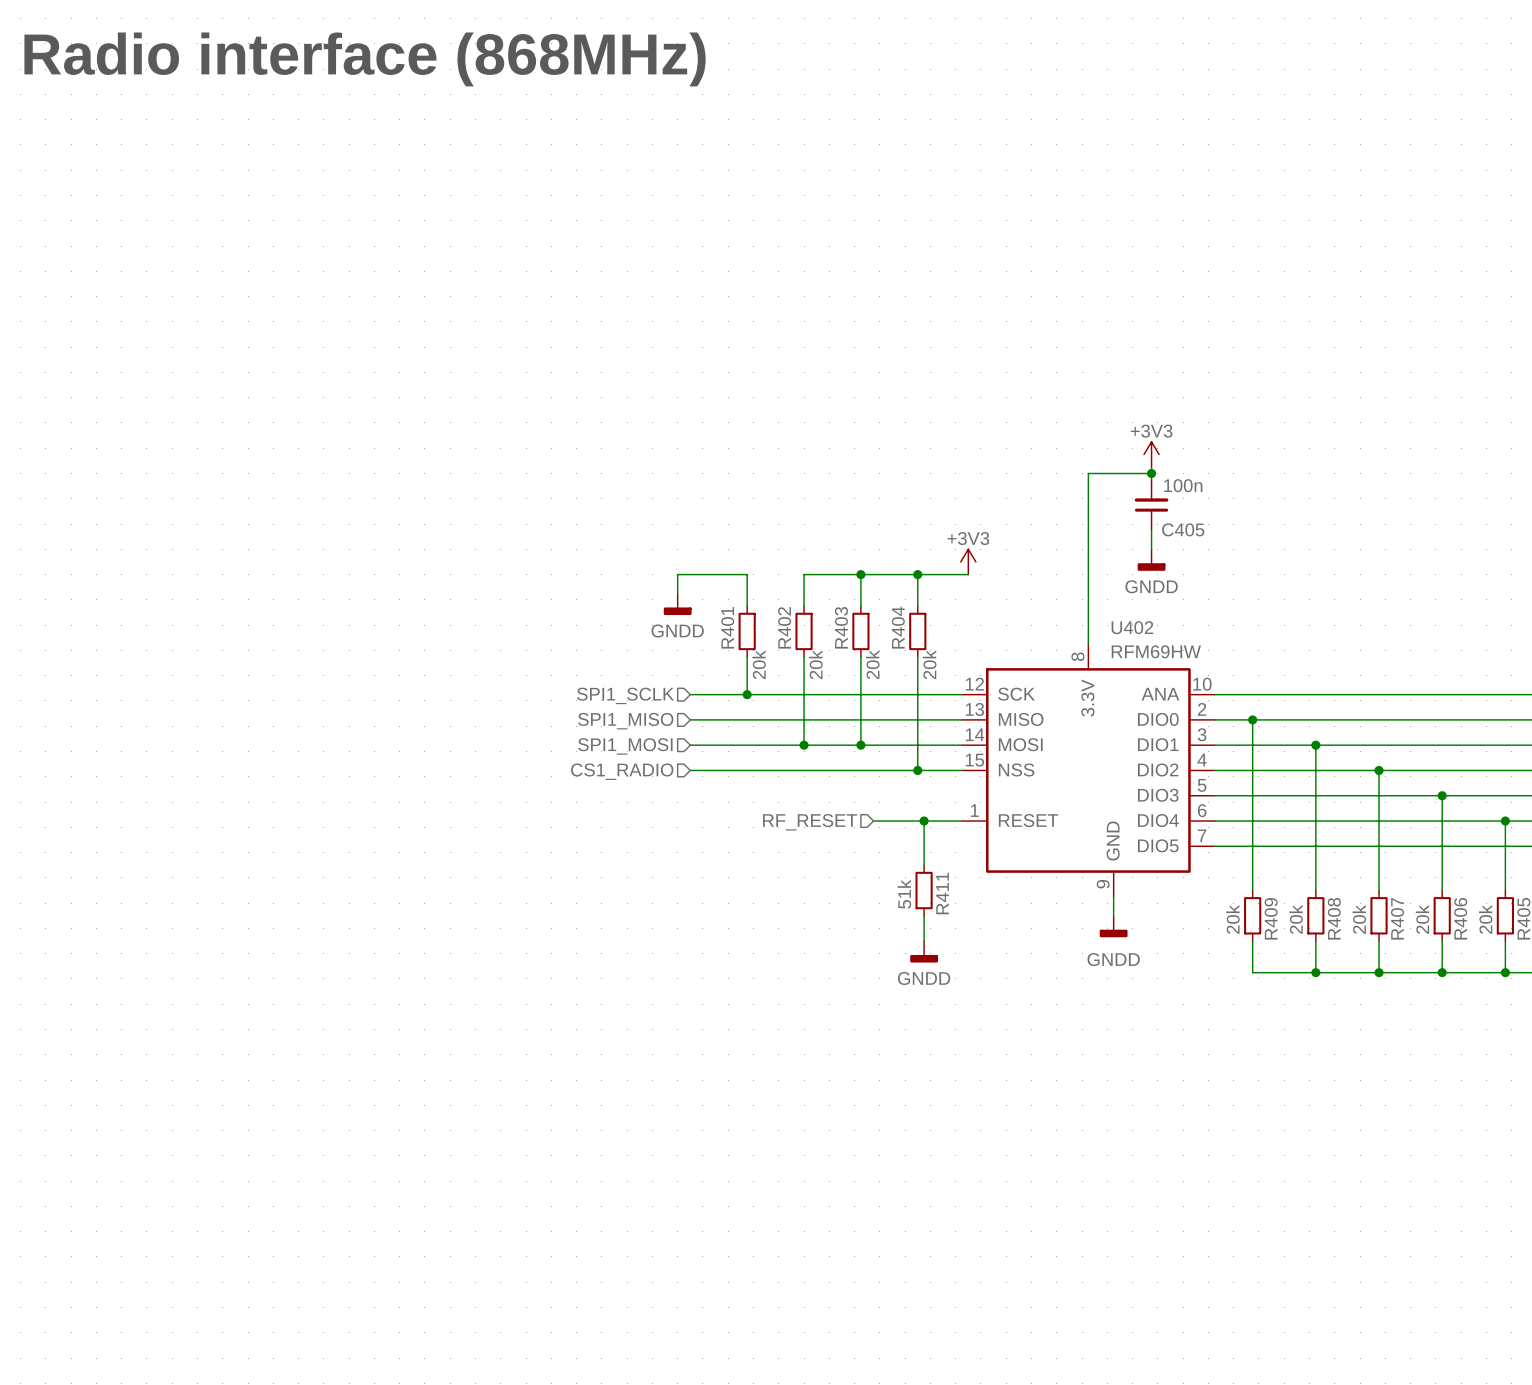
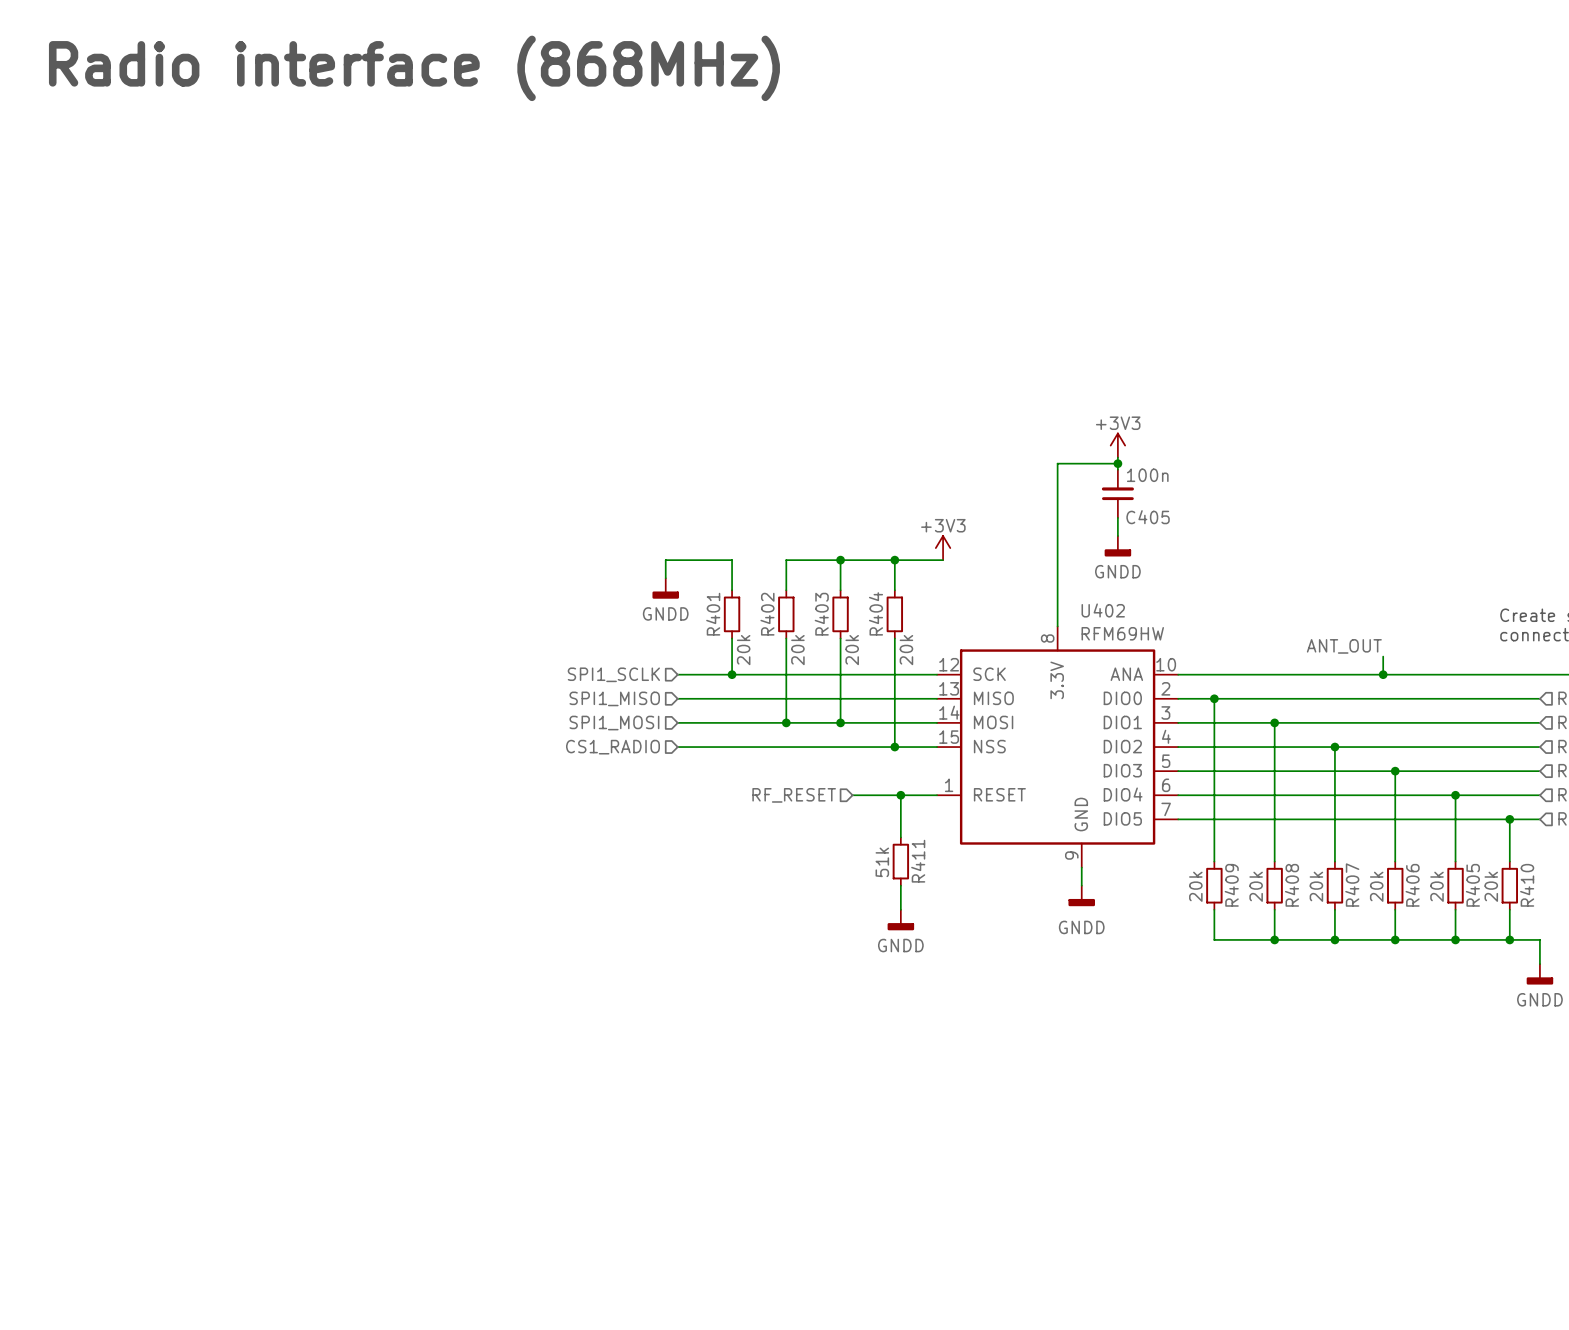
label: none -> ANT_OUT (1344, 646)
wire: none -> (1383, 656) (1383, 674)
junction: none -> (1383, 674)

